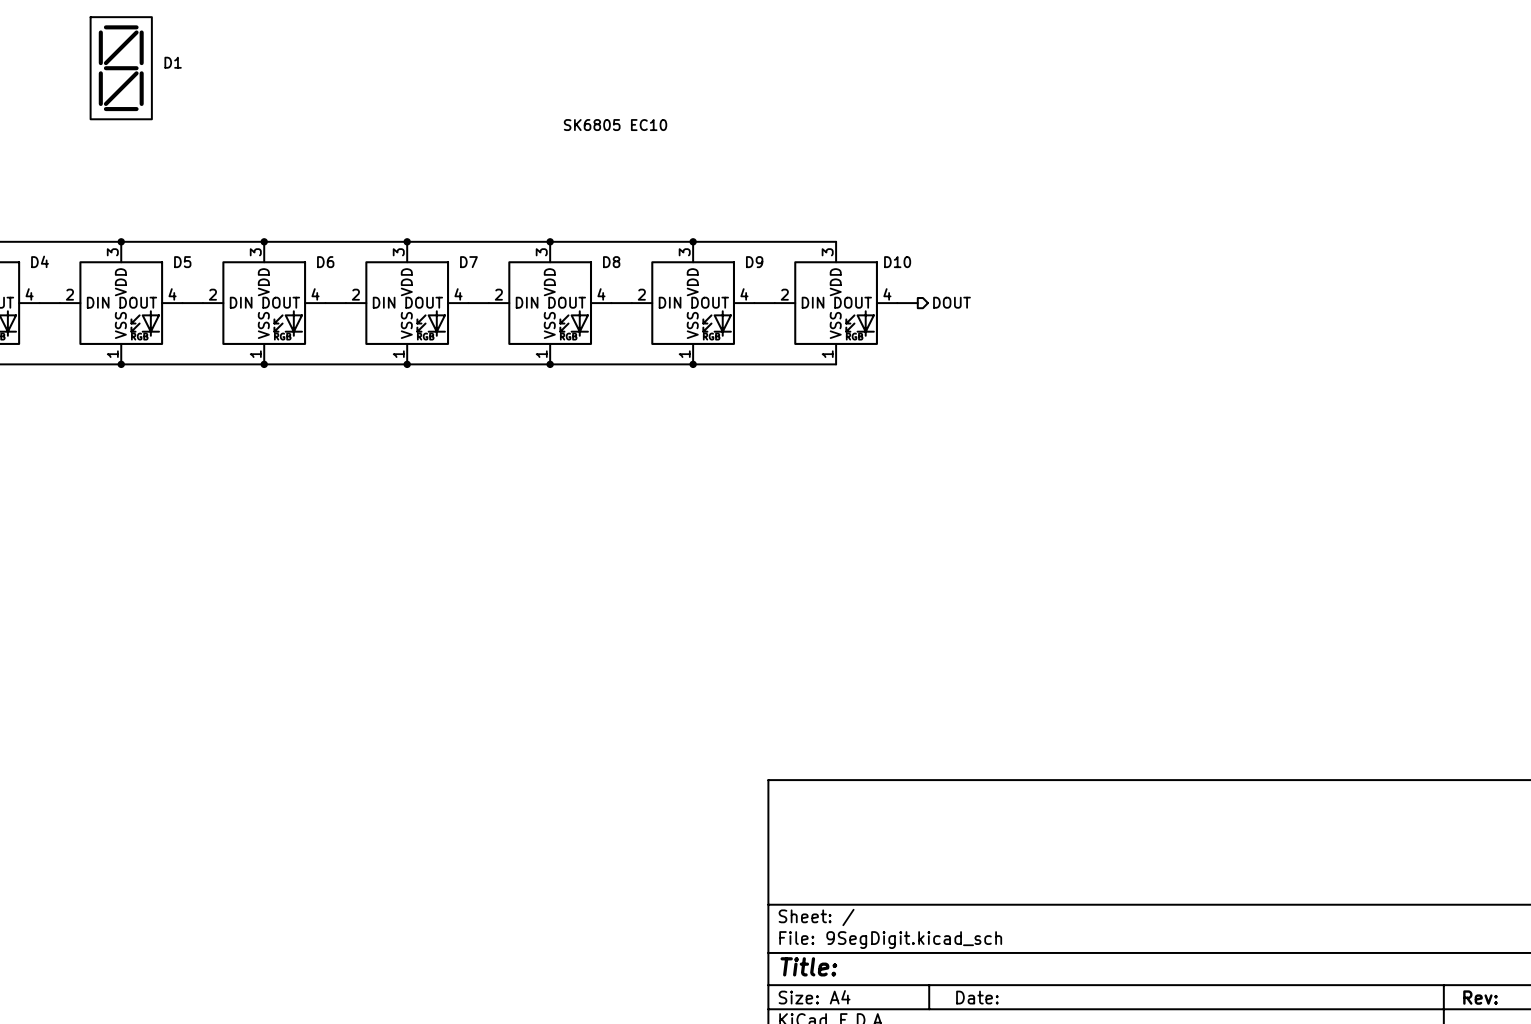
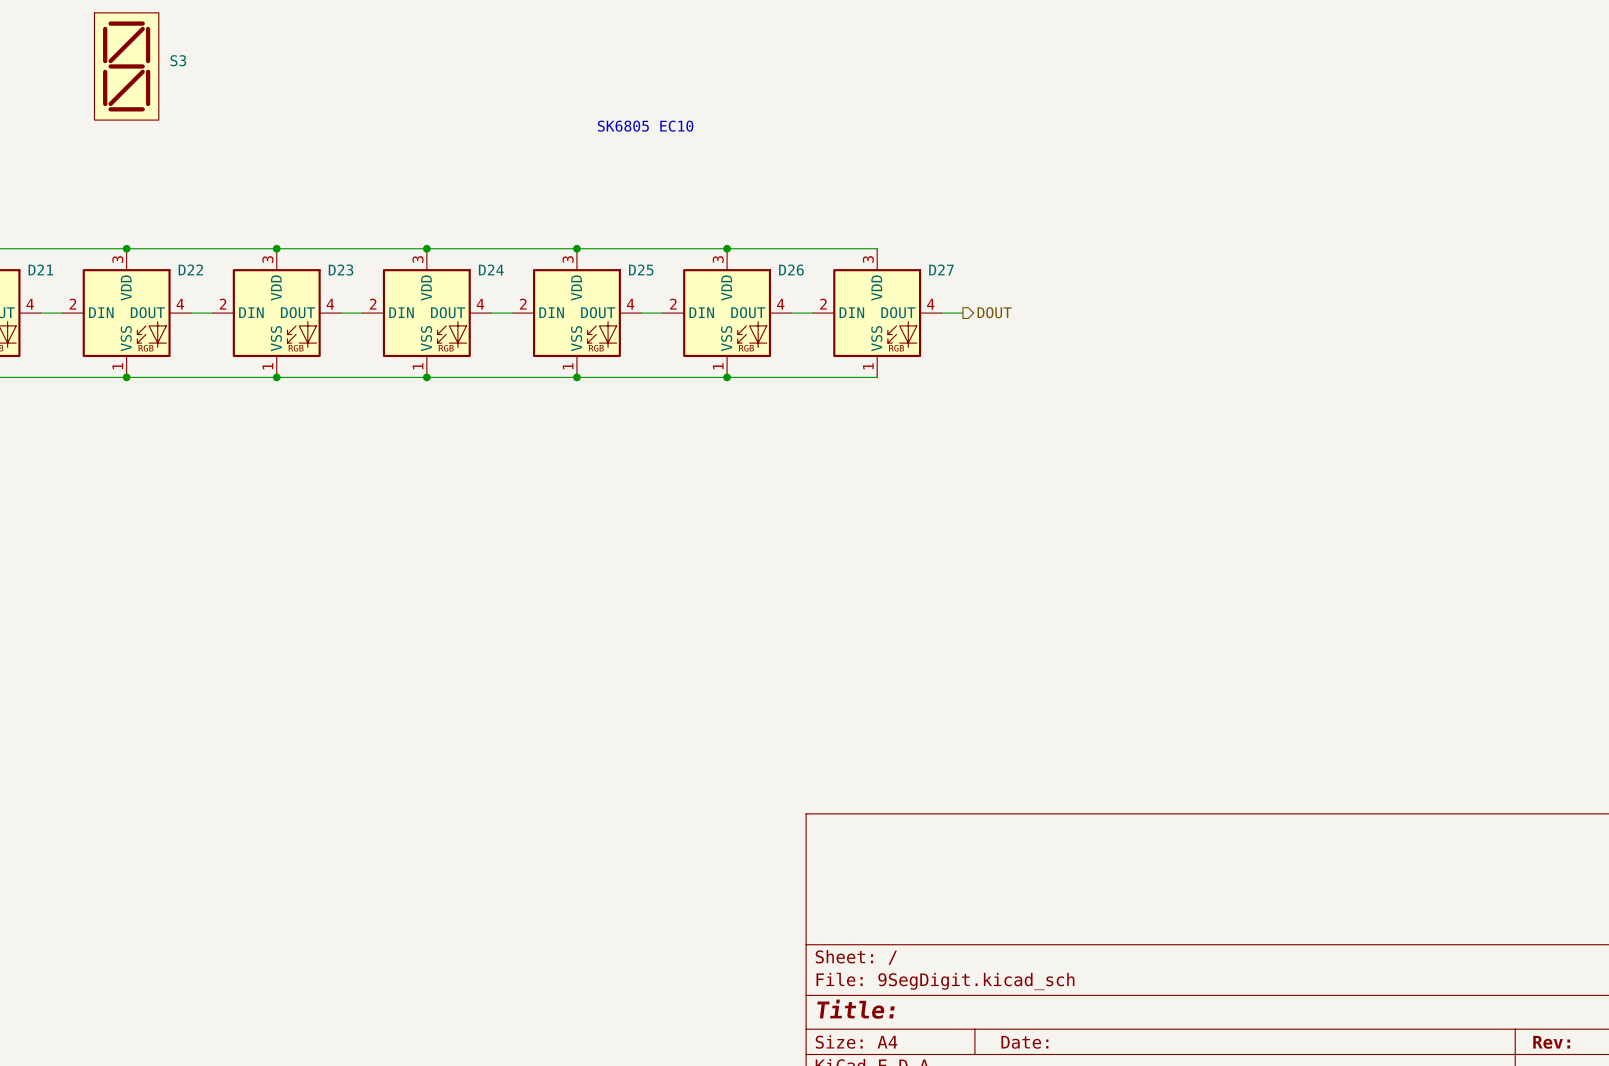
D1 name: D1 (173, 62) -> S3 (178, 60)
D4 name: D4 (40, 261) -> D21 (40, 269)
D5 name: D5 (182, 262) -> D22 (190, 269)
D6 name: D6 (325, 262) -> D23 (341, 270)
D7 name: D7 (468, 262) -> D24 (491, 269)
D8 name: D8 (611, 262) -> D25 (641, 270)
D9 name: D9 (754, 262) -> D26 (791, 270)
D10 name: D10 (897, 262) -> D27 (941, 269)

